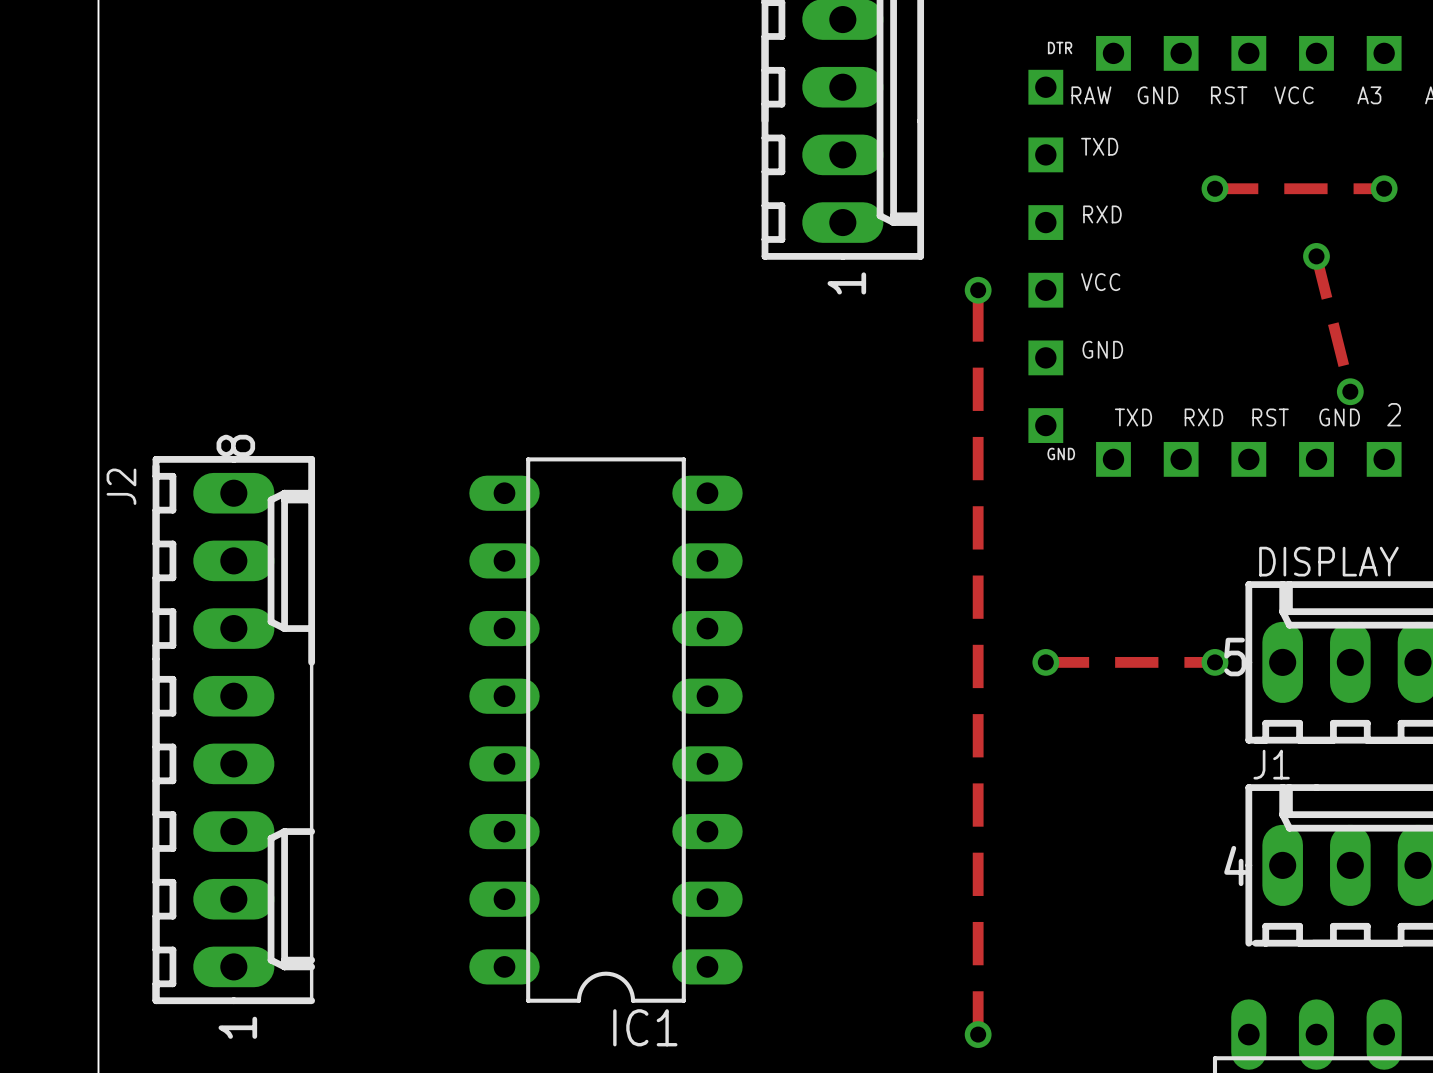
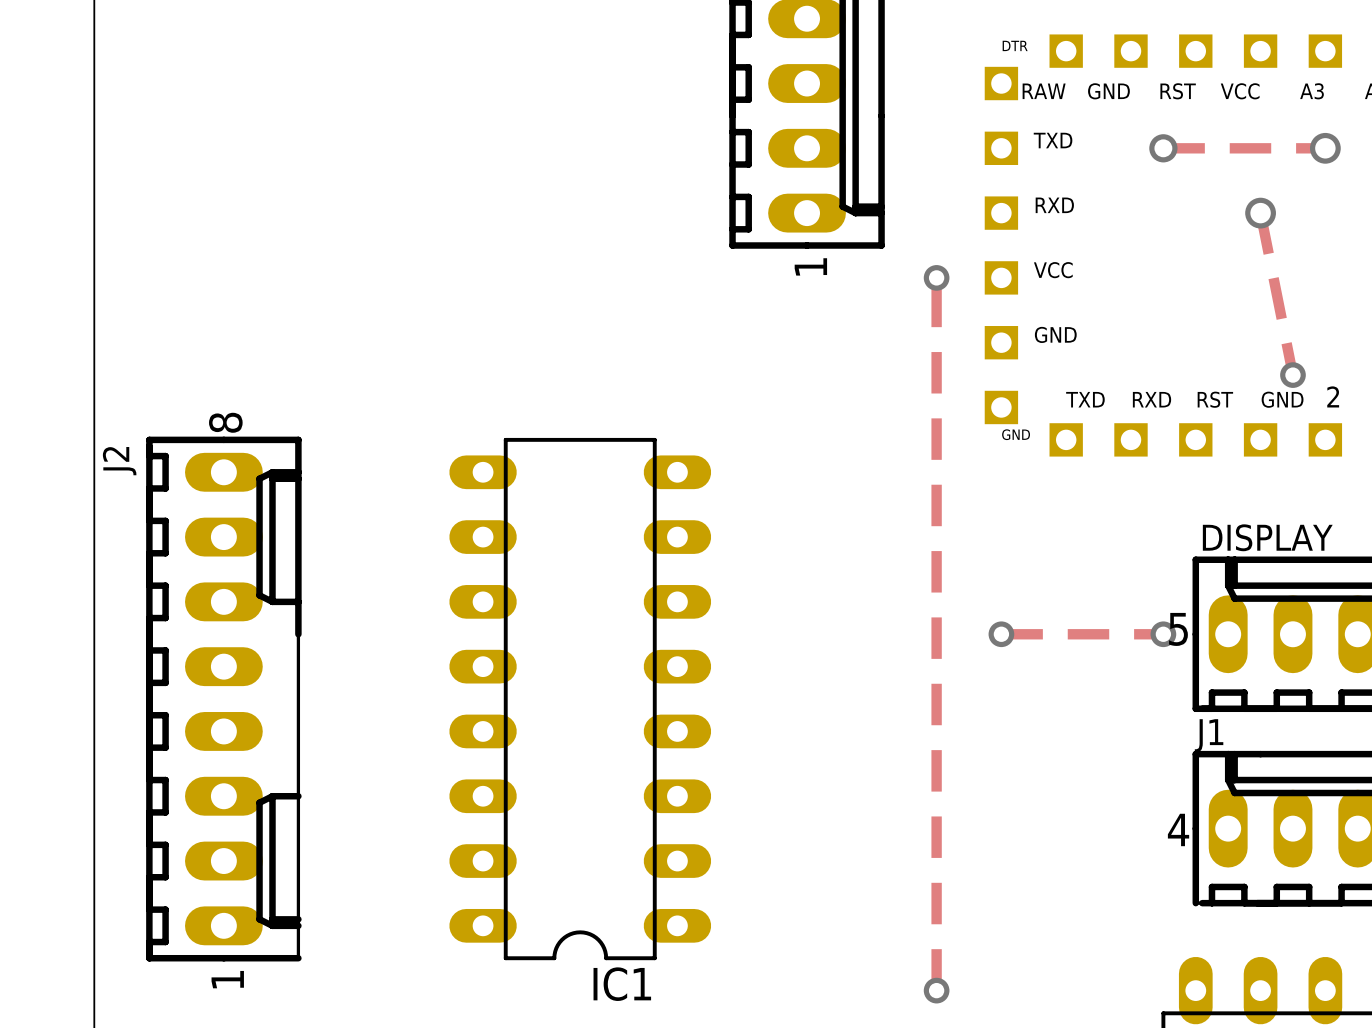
via: none -> (1163, 148)
via: none -> (1325, 148)
track: (1214, 188) (1384, 188) -> (1163, 148) (1325, 148)
via: (1214, 188) -> none
via: (1384, 188) -> none
via: none -> (1260, 213)
track: (1316, 256) (1350, 391) -> (1260, 213) (1292, 375)
via: (1316, 256) -> none

